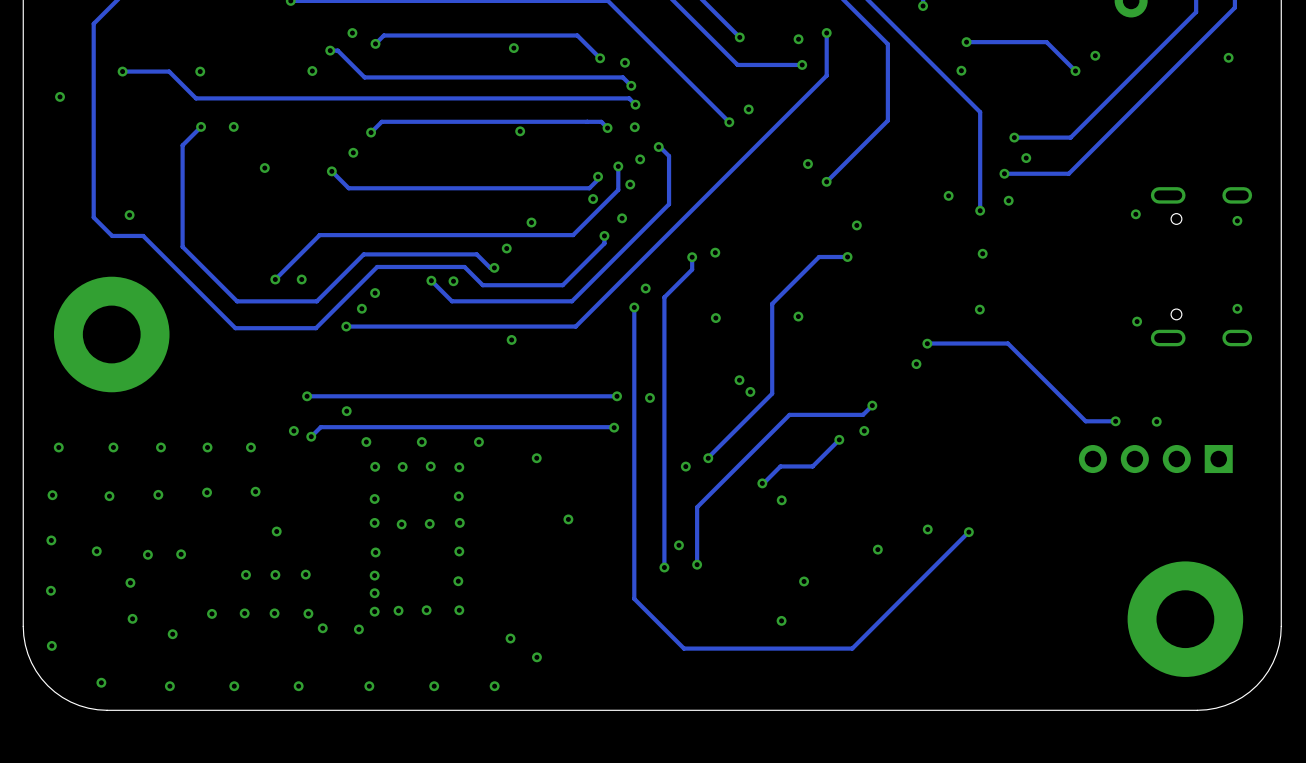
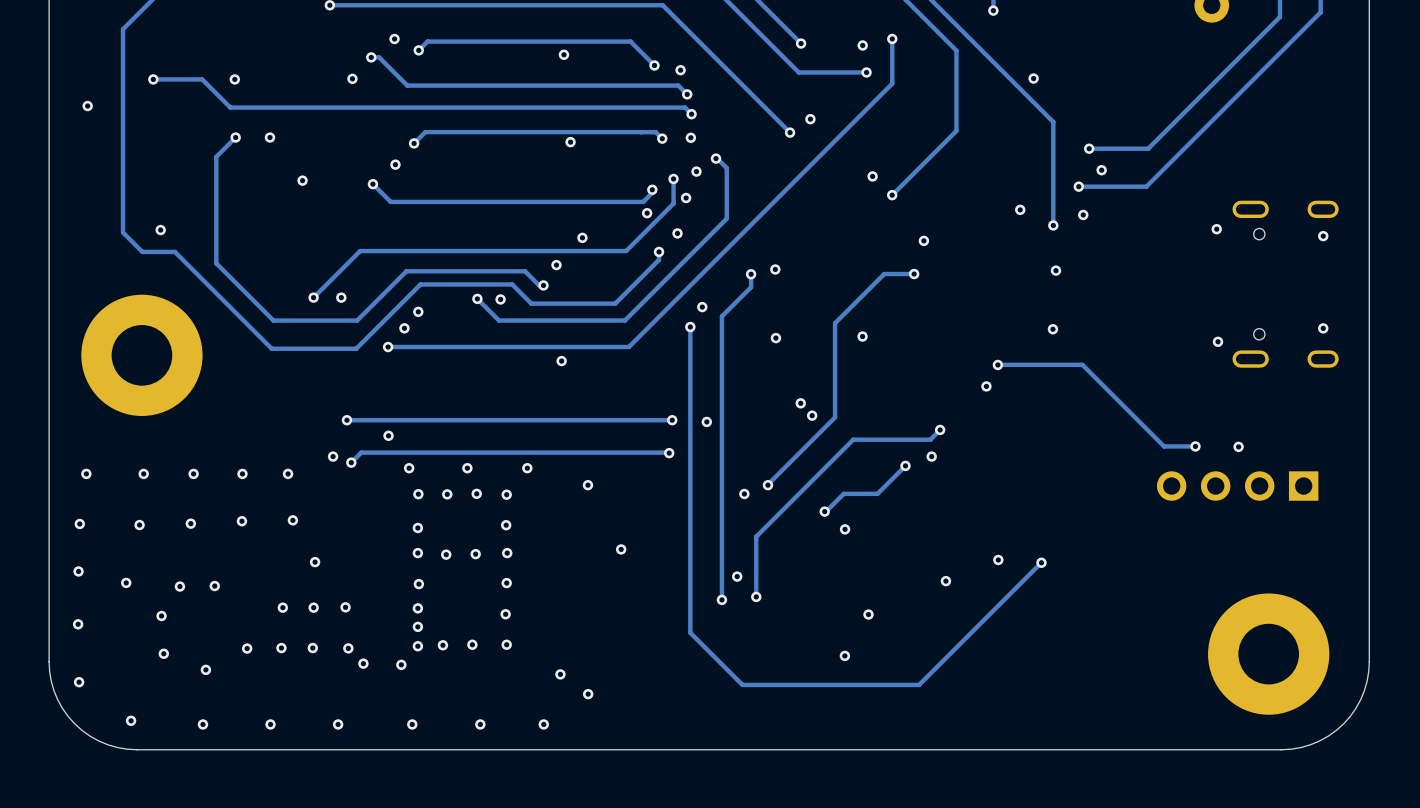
track: (966, 42) (1046, 42) (1075, 71) -> none
via: (966, 42) -> none
via: (1095, 55) -> none
via: (1228, 57) -> none
via: (1075, 71) -> none

